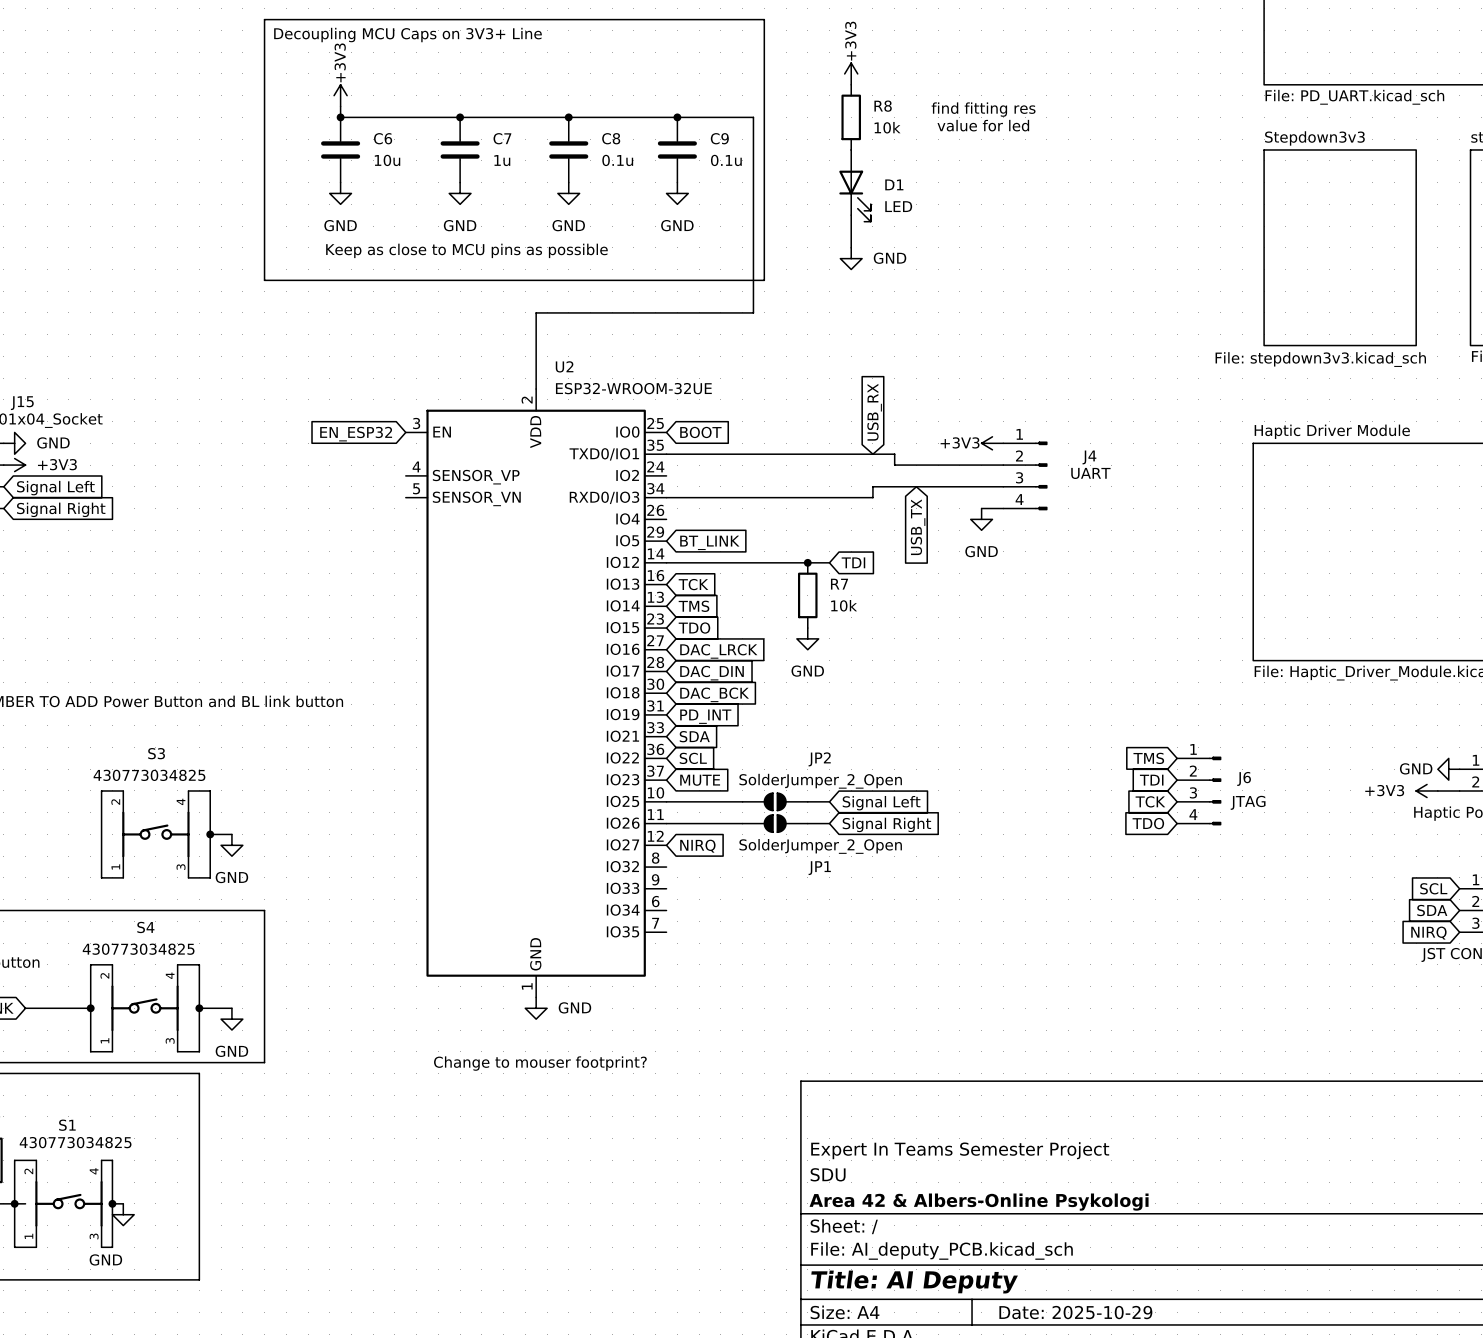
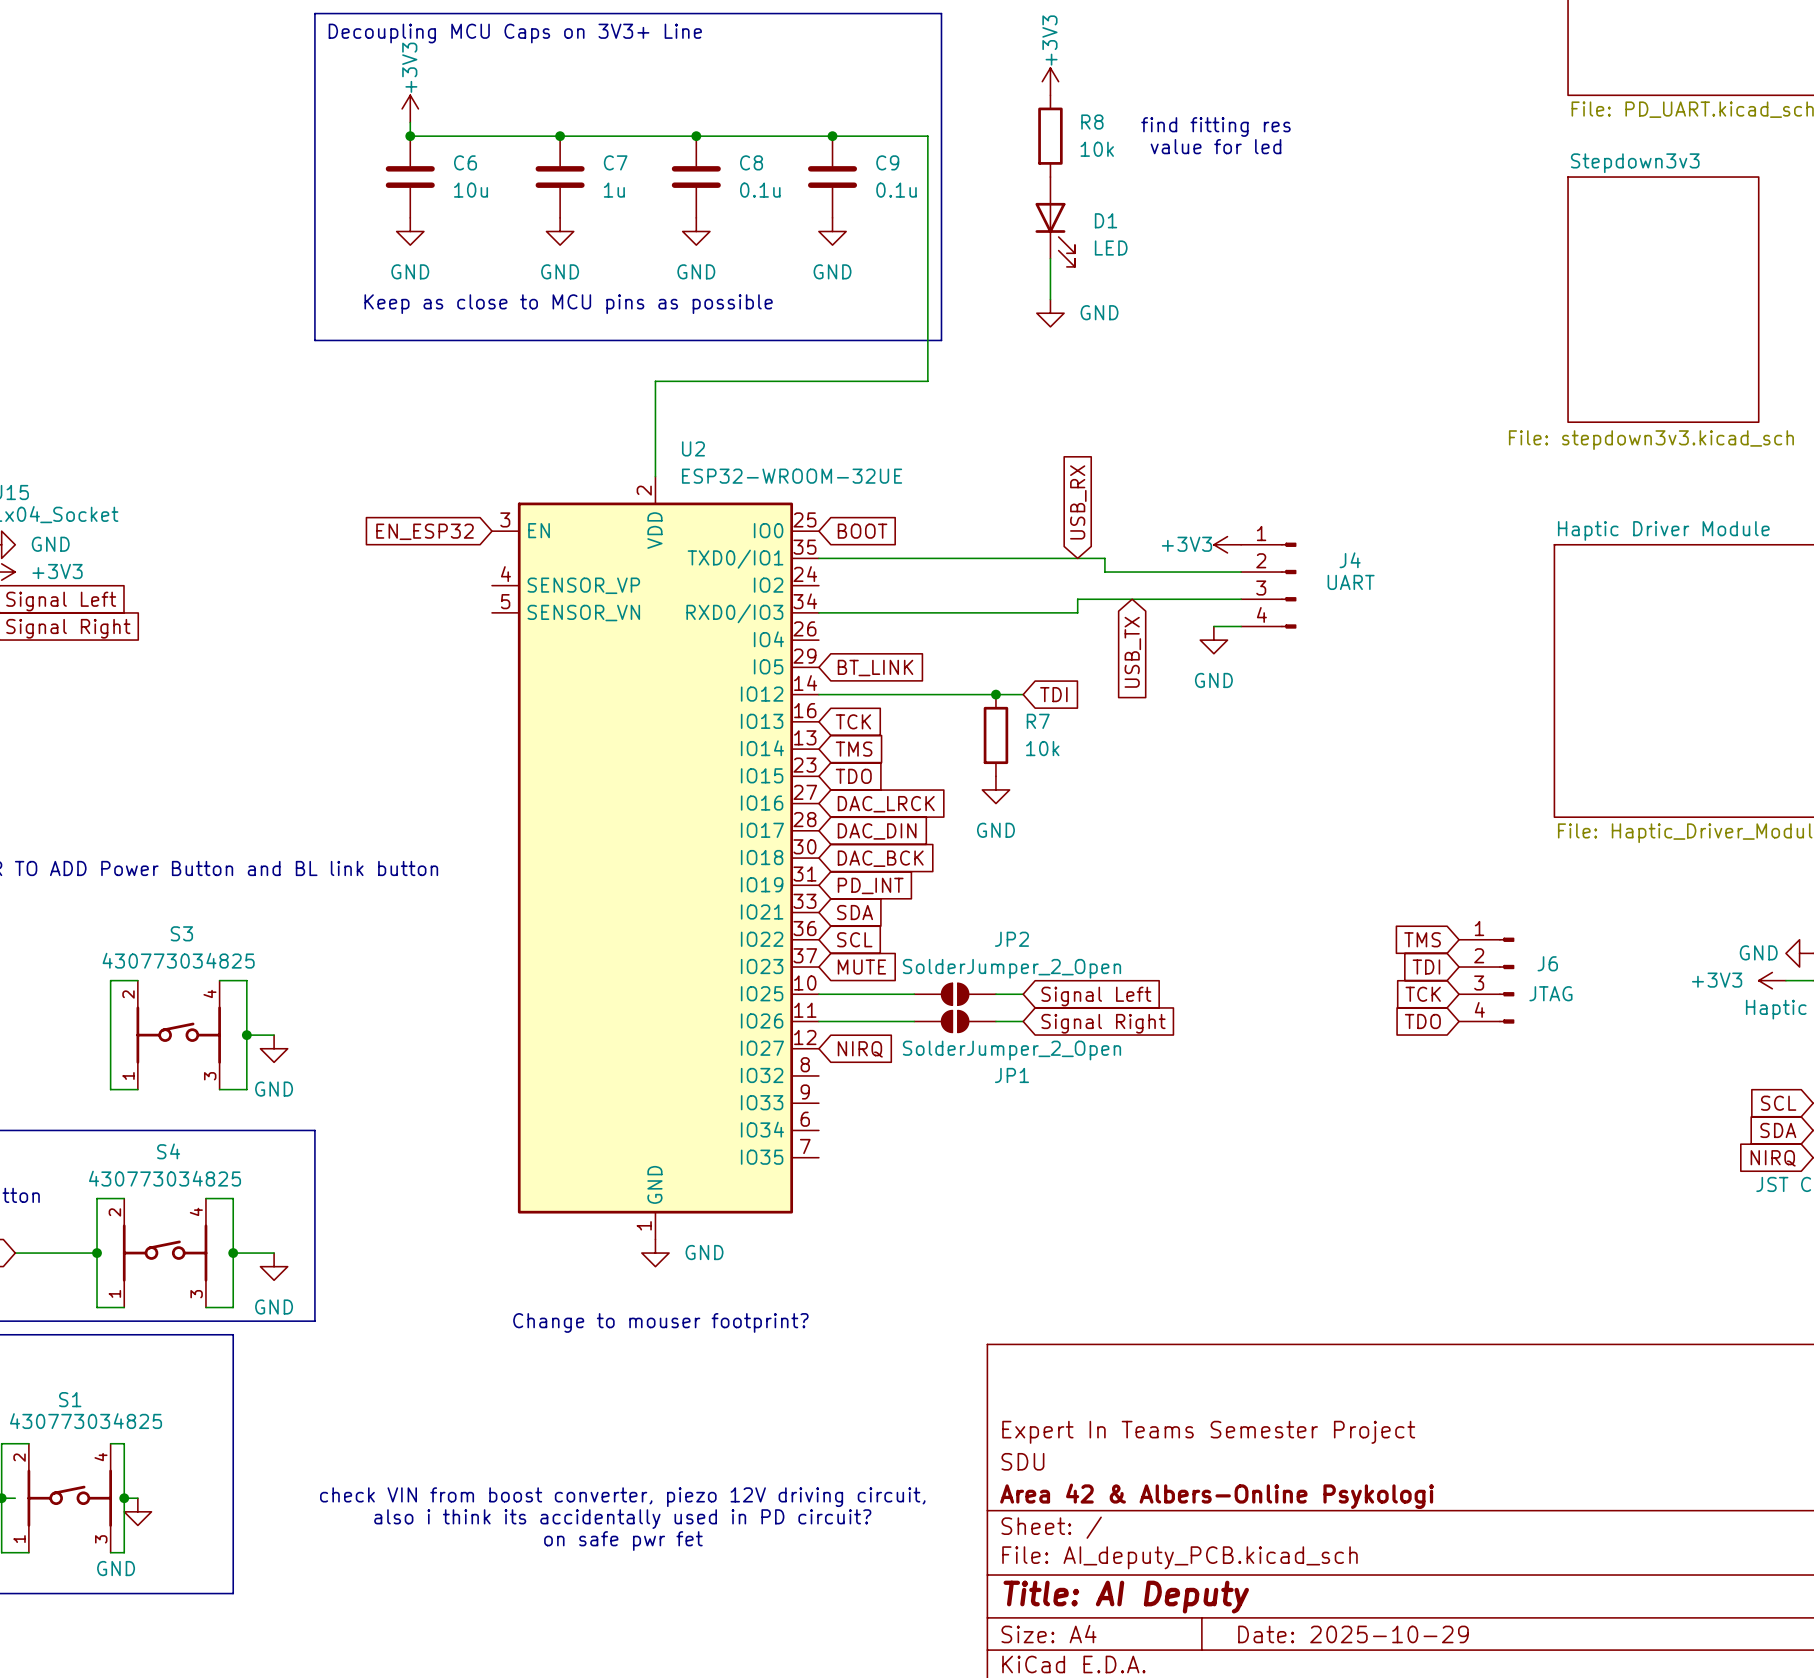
text: none -> check VIN from boost converter, piezo 12V driving circuit, (622, 1497)
text: none -> also i think its accidentally used in PD circuit? (622, 1519)
text: none -> on safe pwr fet (623, 1541)

